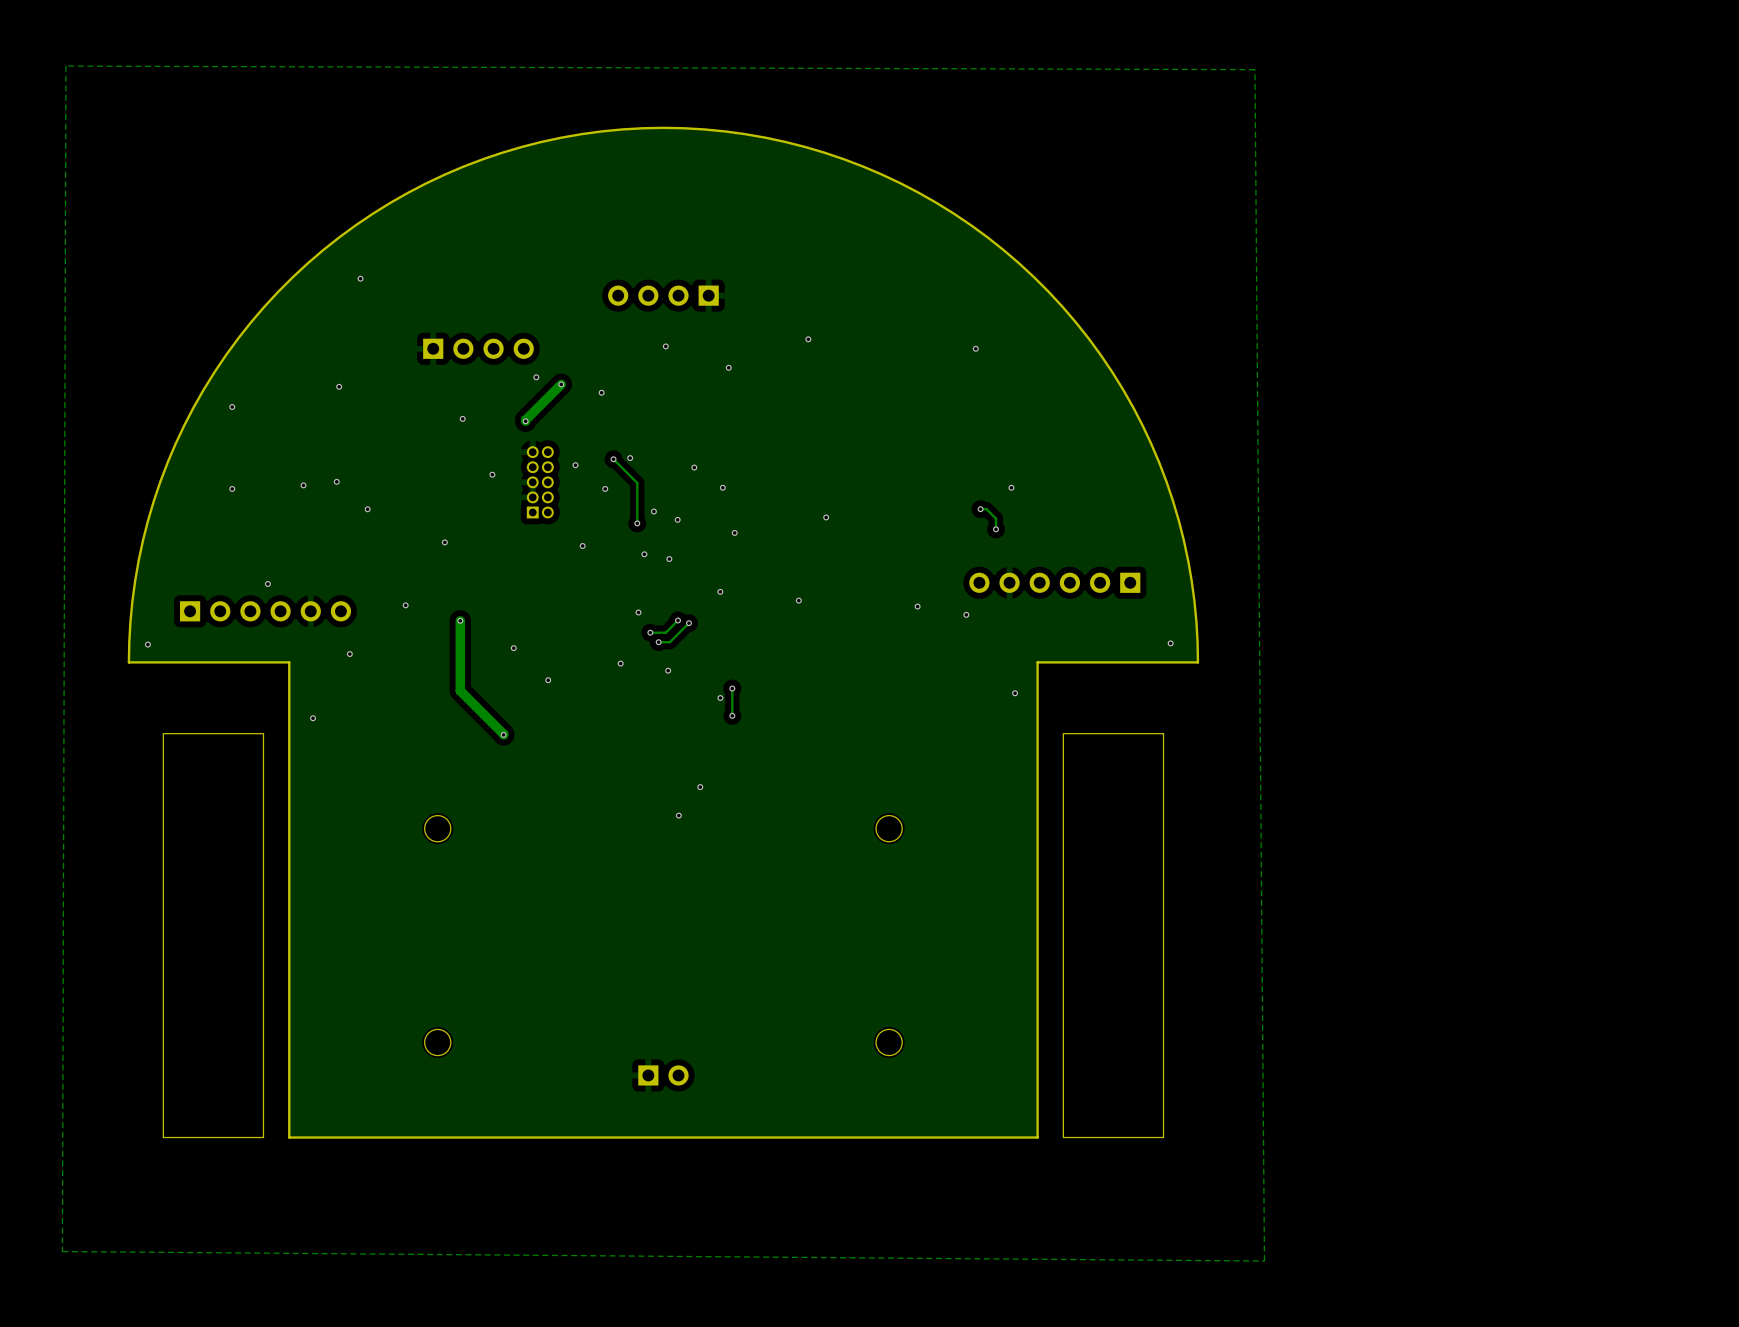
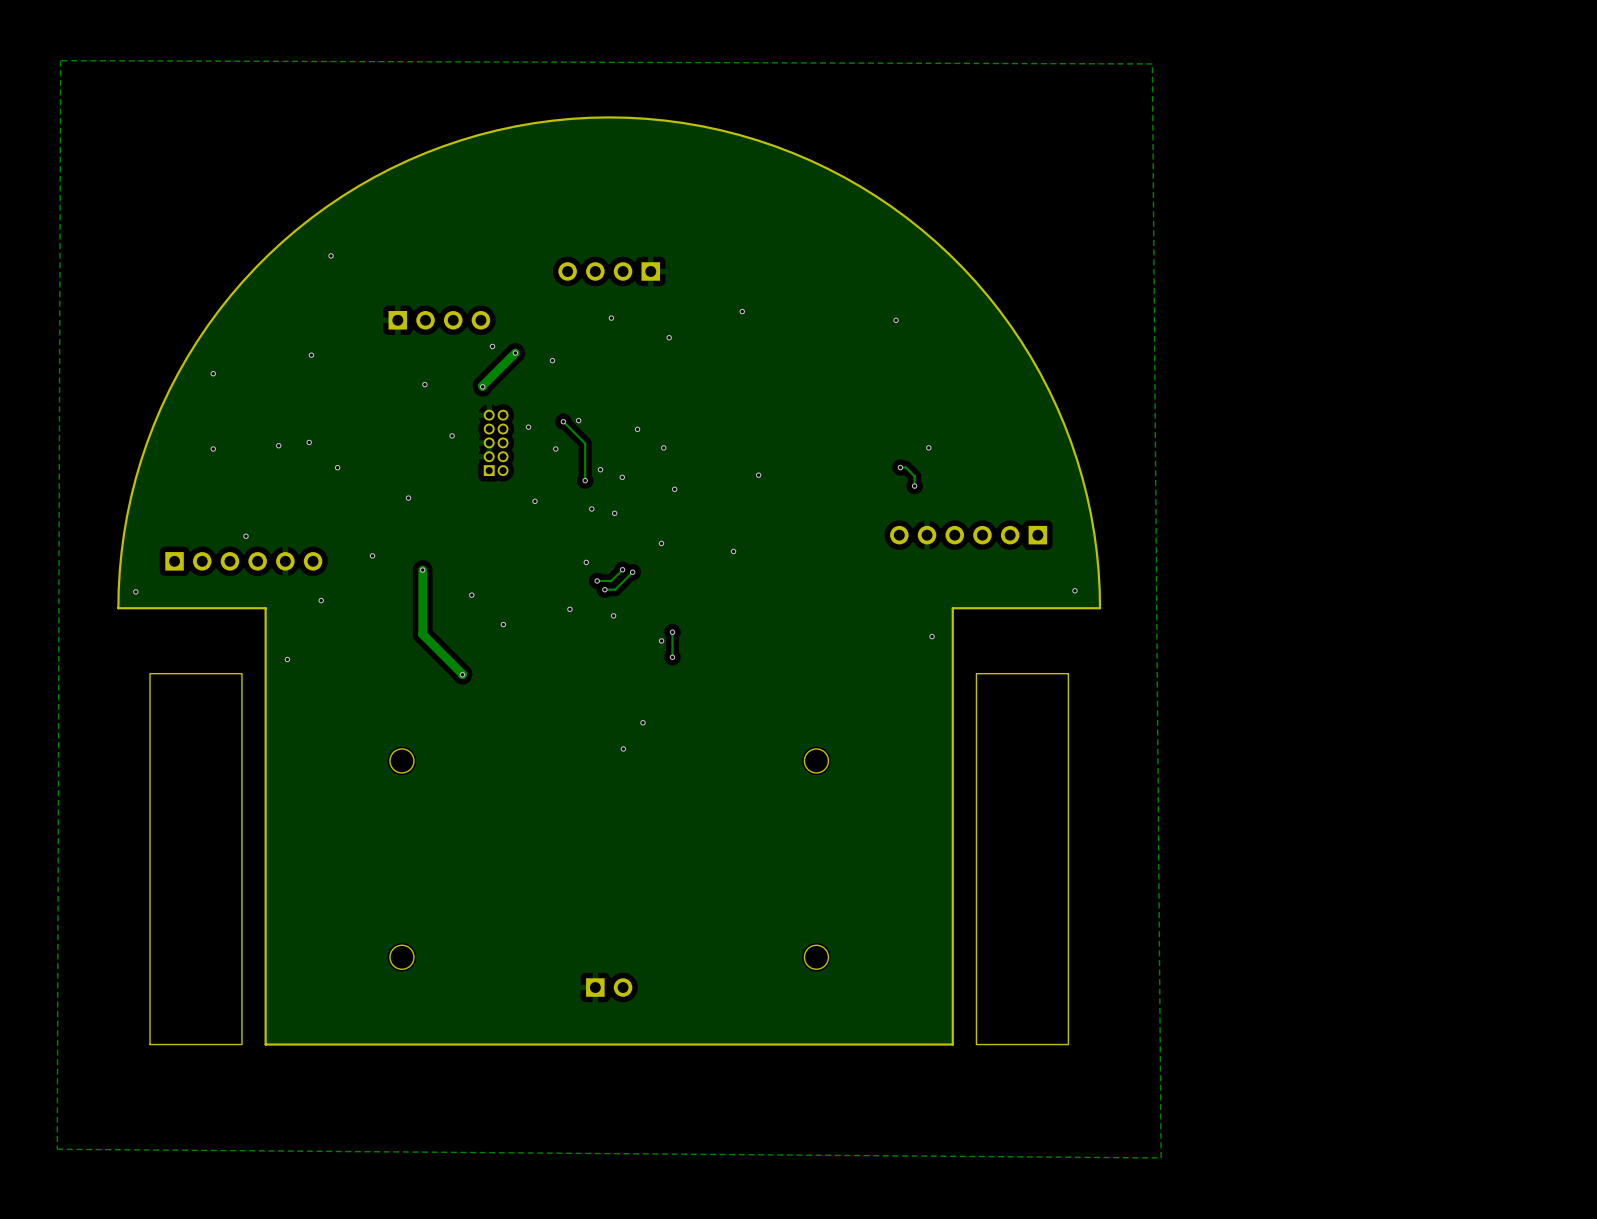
via: (917, 606) -> none
via: (966, 614) -> none

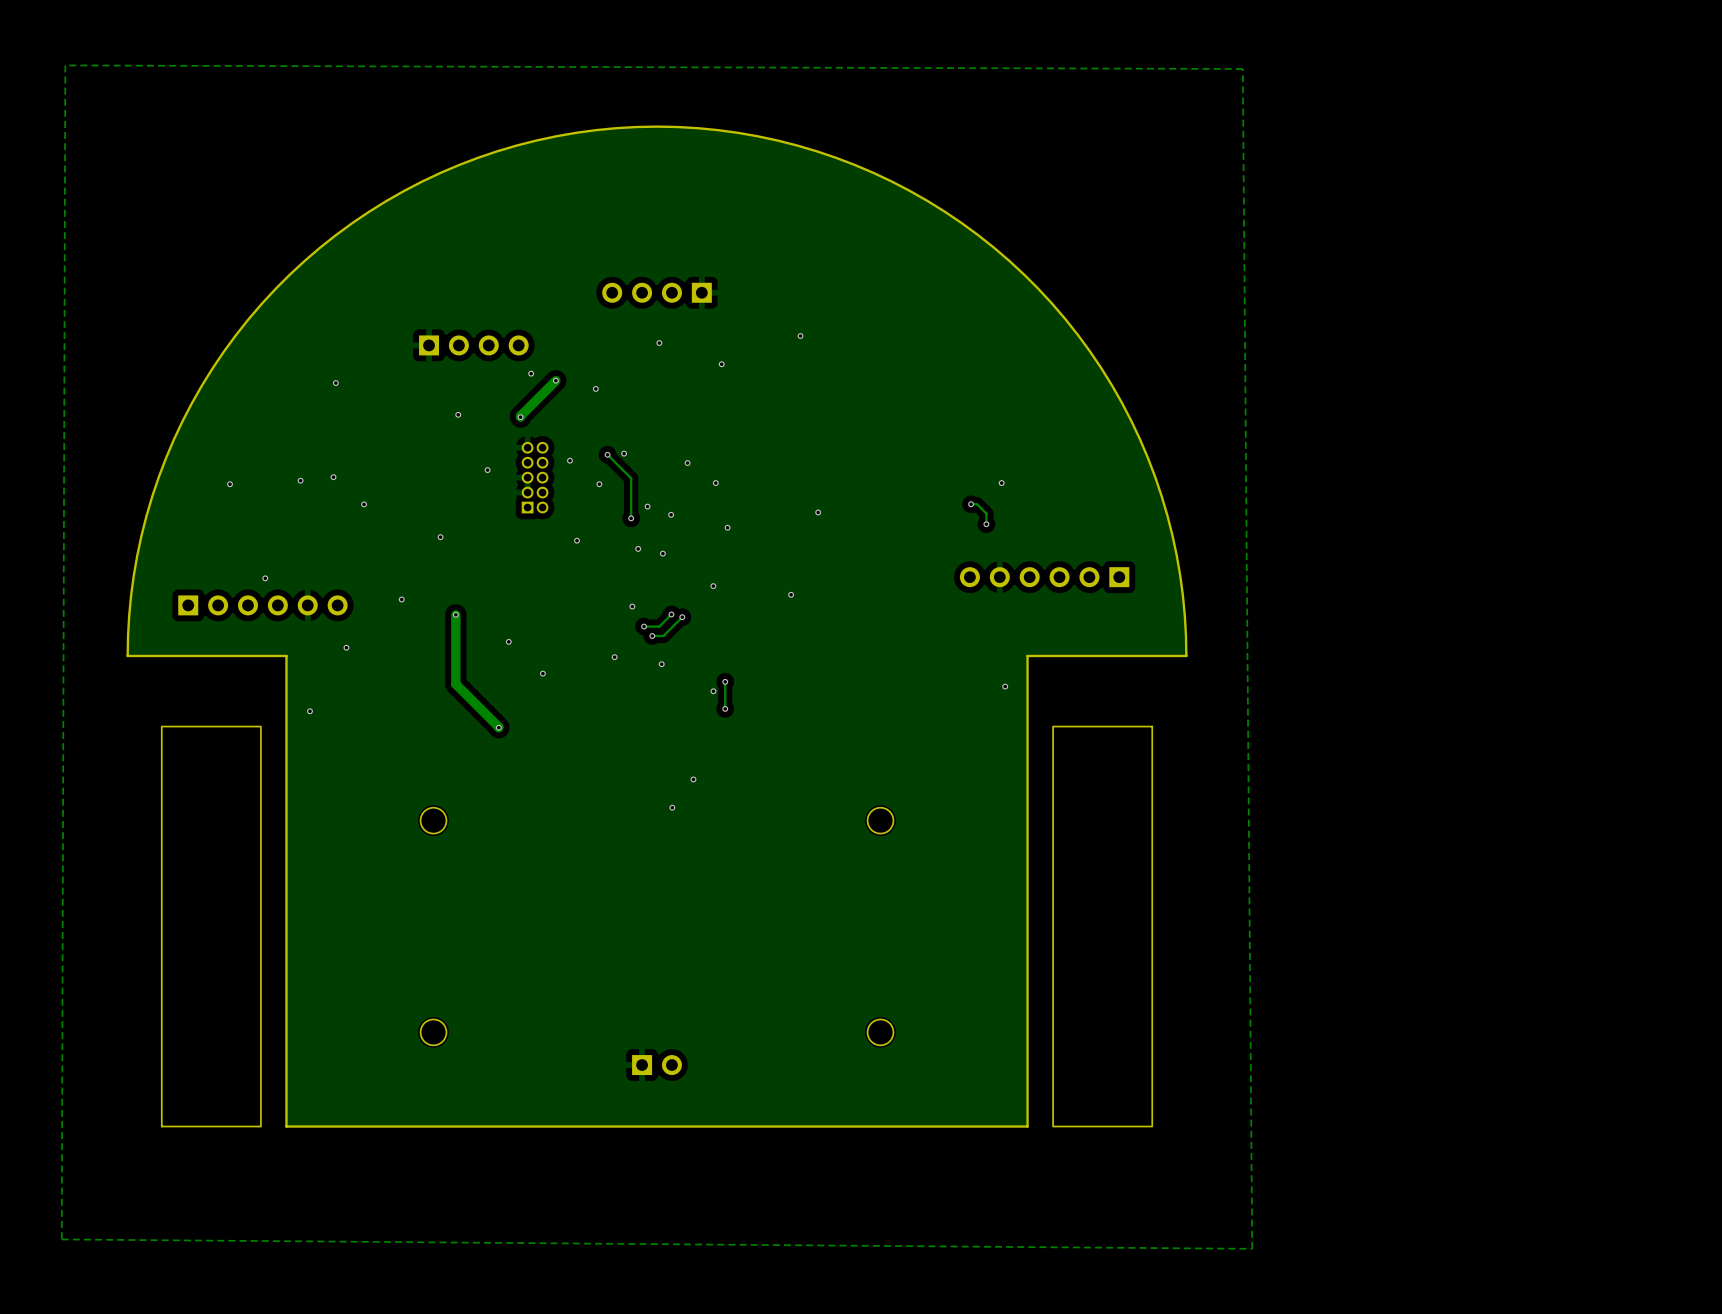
via: (331, 255) -> none
via: (896, 320) -> none
via: (213, 373) -> none
via: (1074, 590) -> none
via: (135, 591) -> none

